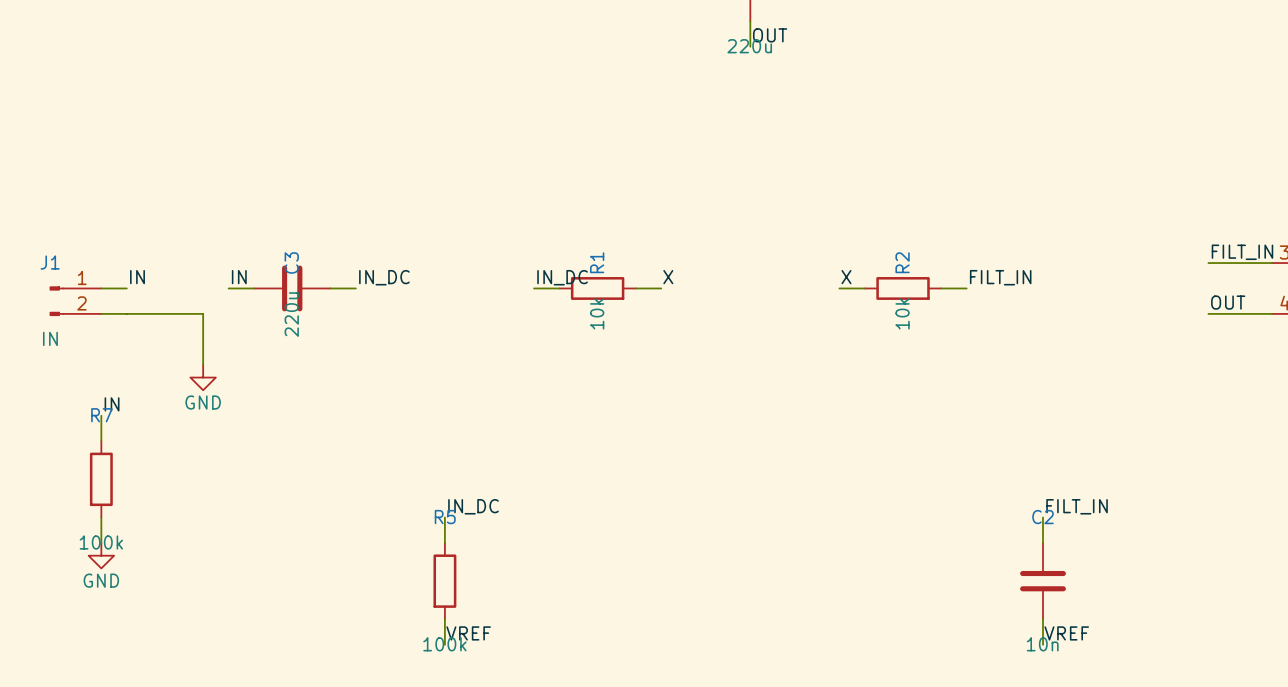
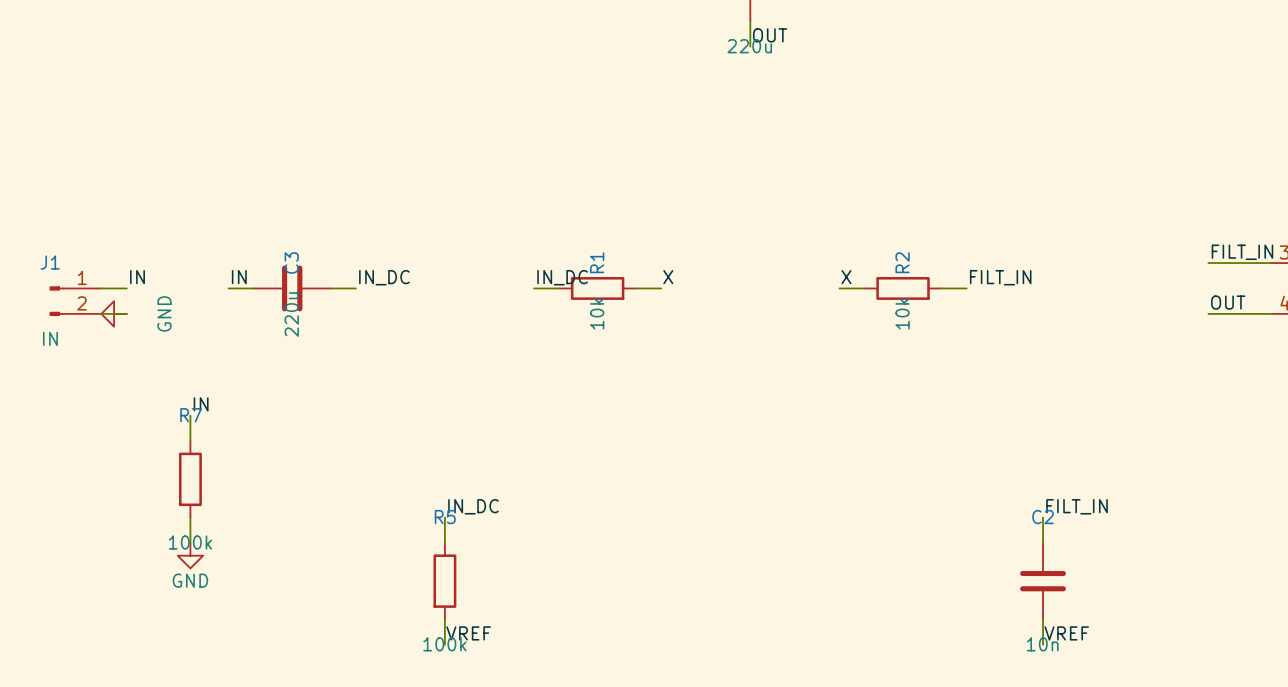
power symbol: none -> GND (114, 313)
wire: (126, 313) (203, 313) (203, 364) -> none
power symbol: GND (203, 377) -> none
label position: IN (112, 404) -> IN (201, 404)
wire: (101, 415) (101, 441) -> (190, 415) (190, 441)
R7 position: (101, 479) -> (190, 479)
wire: (101, 517) (101, 542) -> (190, 517) (190, 542)
power symbol position: GND (101, 555) -> GND (190, 555)

